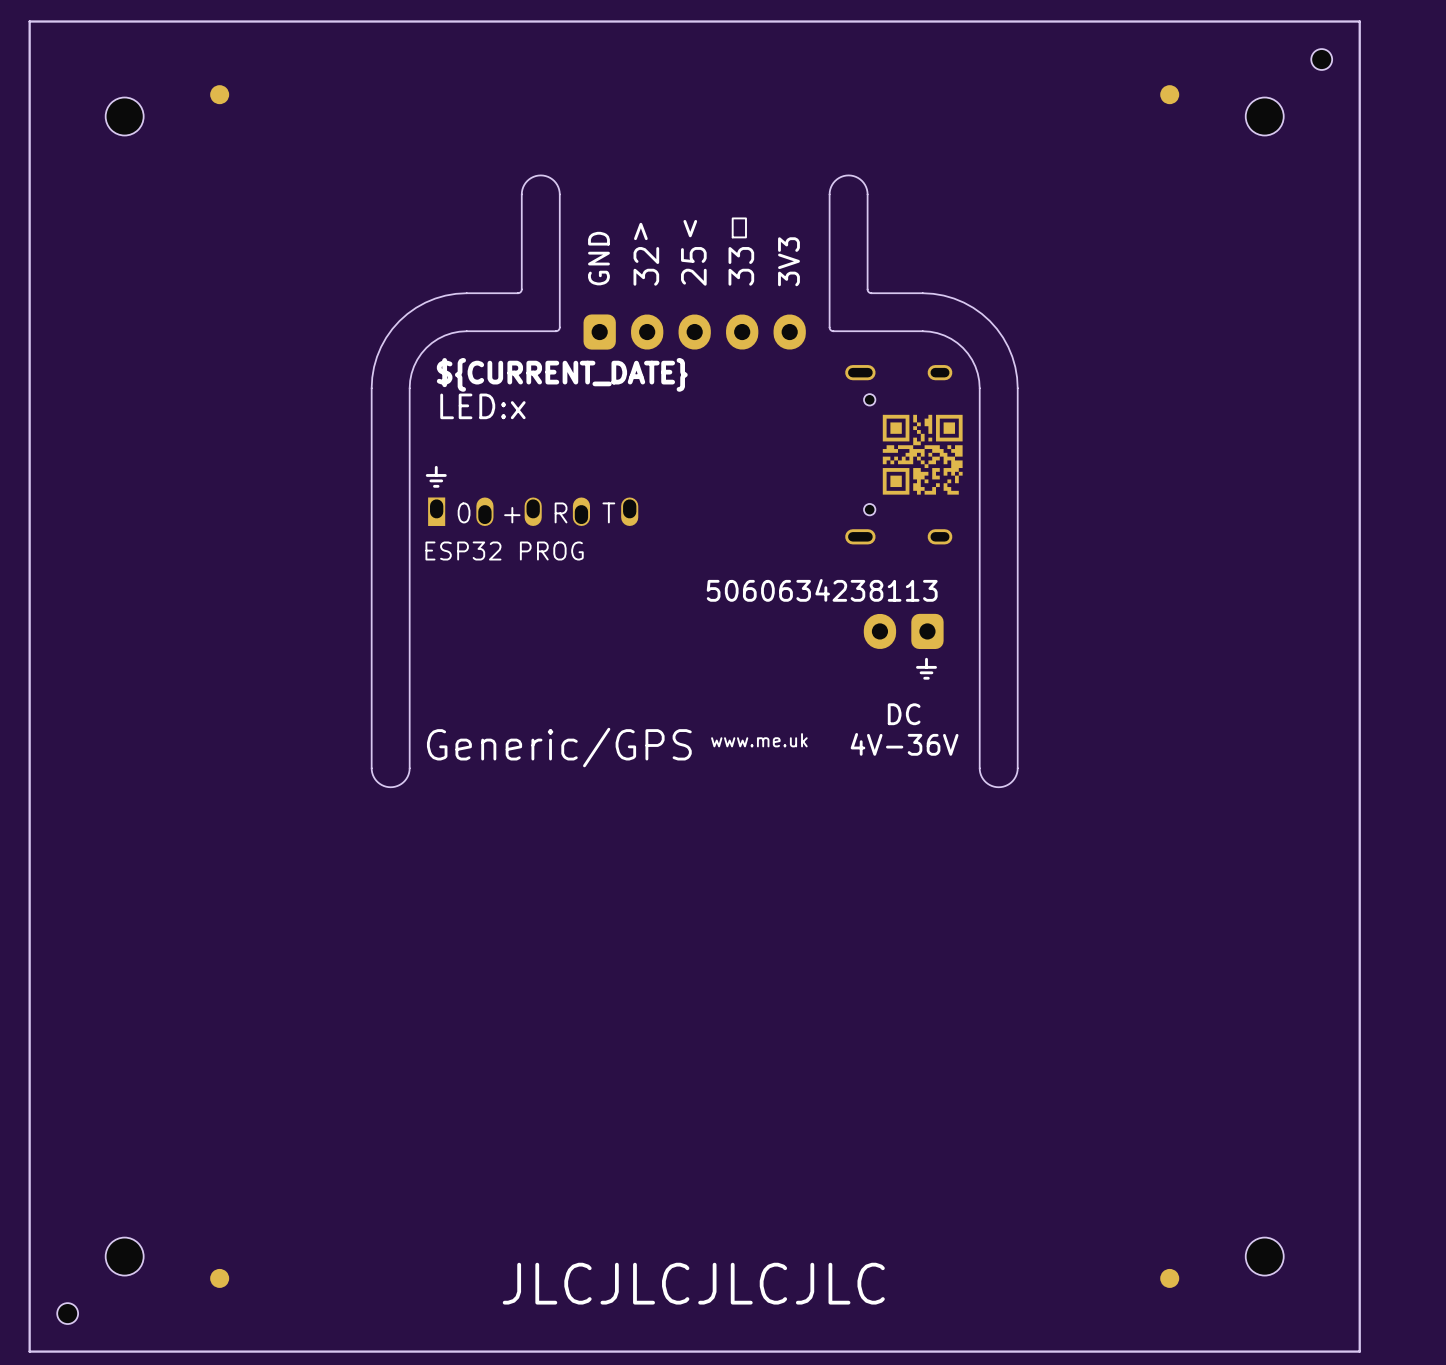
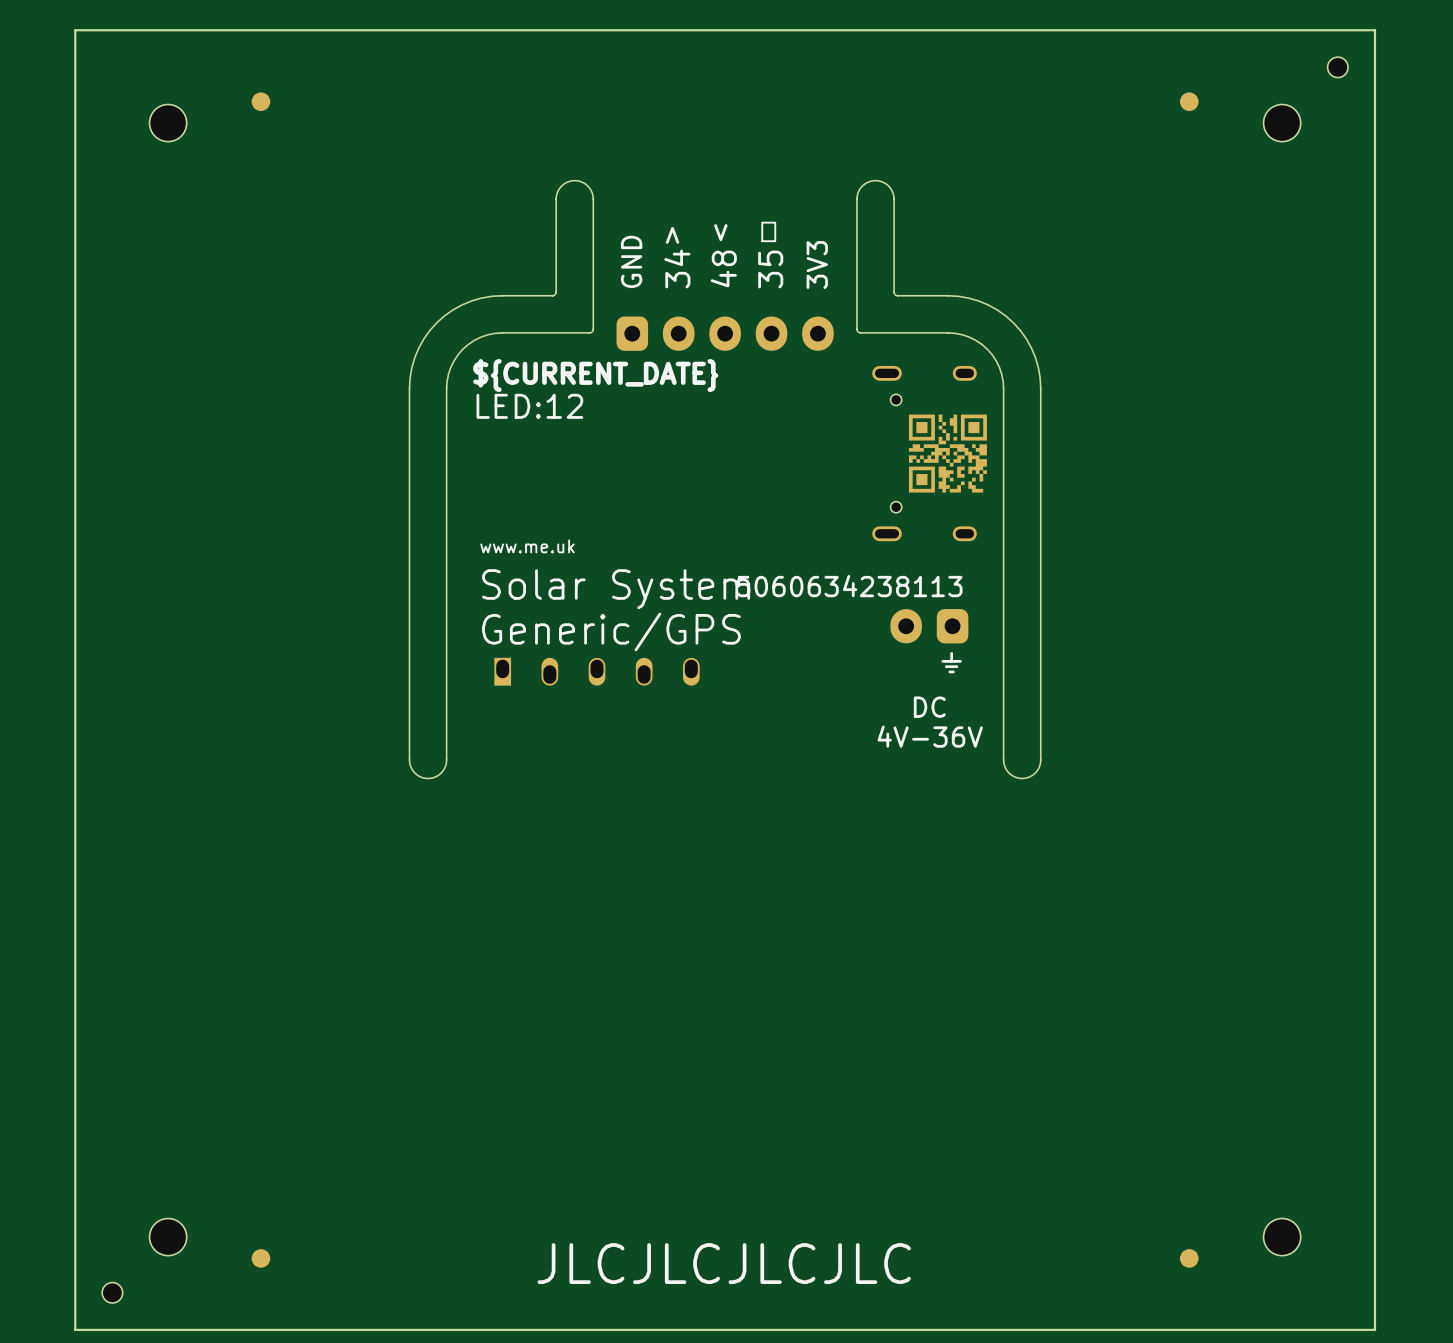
text: 32 (646, 266) -> 34 (677, 268)
text: 25 (693, 266) -> 48 (723, 268)
text: 33 (741, 266) -> 35 (770, 269)
text: LED:x (482, 406) -> LED:12 (529, 406)
part: (533, 511) -> none
text: none -> Solar System (616, 589)
part: none -> (597, 671)
drawing position: (759, 740) -> (527, 546)
text position: Generic/GPS (559, 747) -> Generic/GPS (611, 631)

